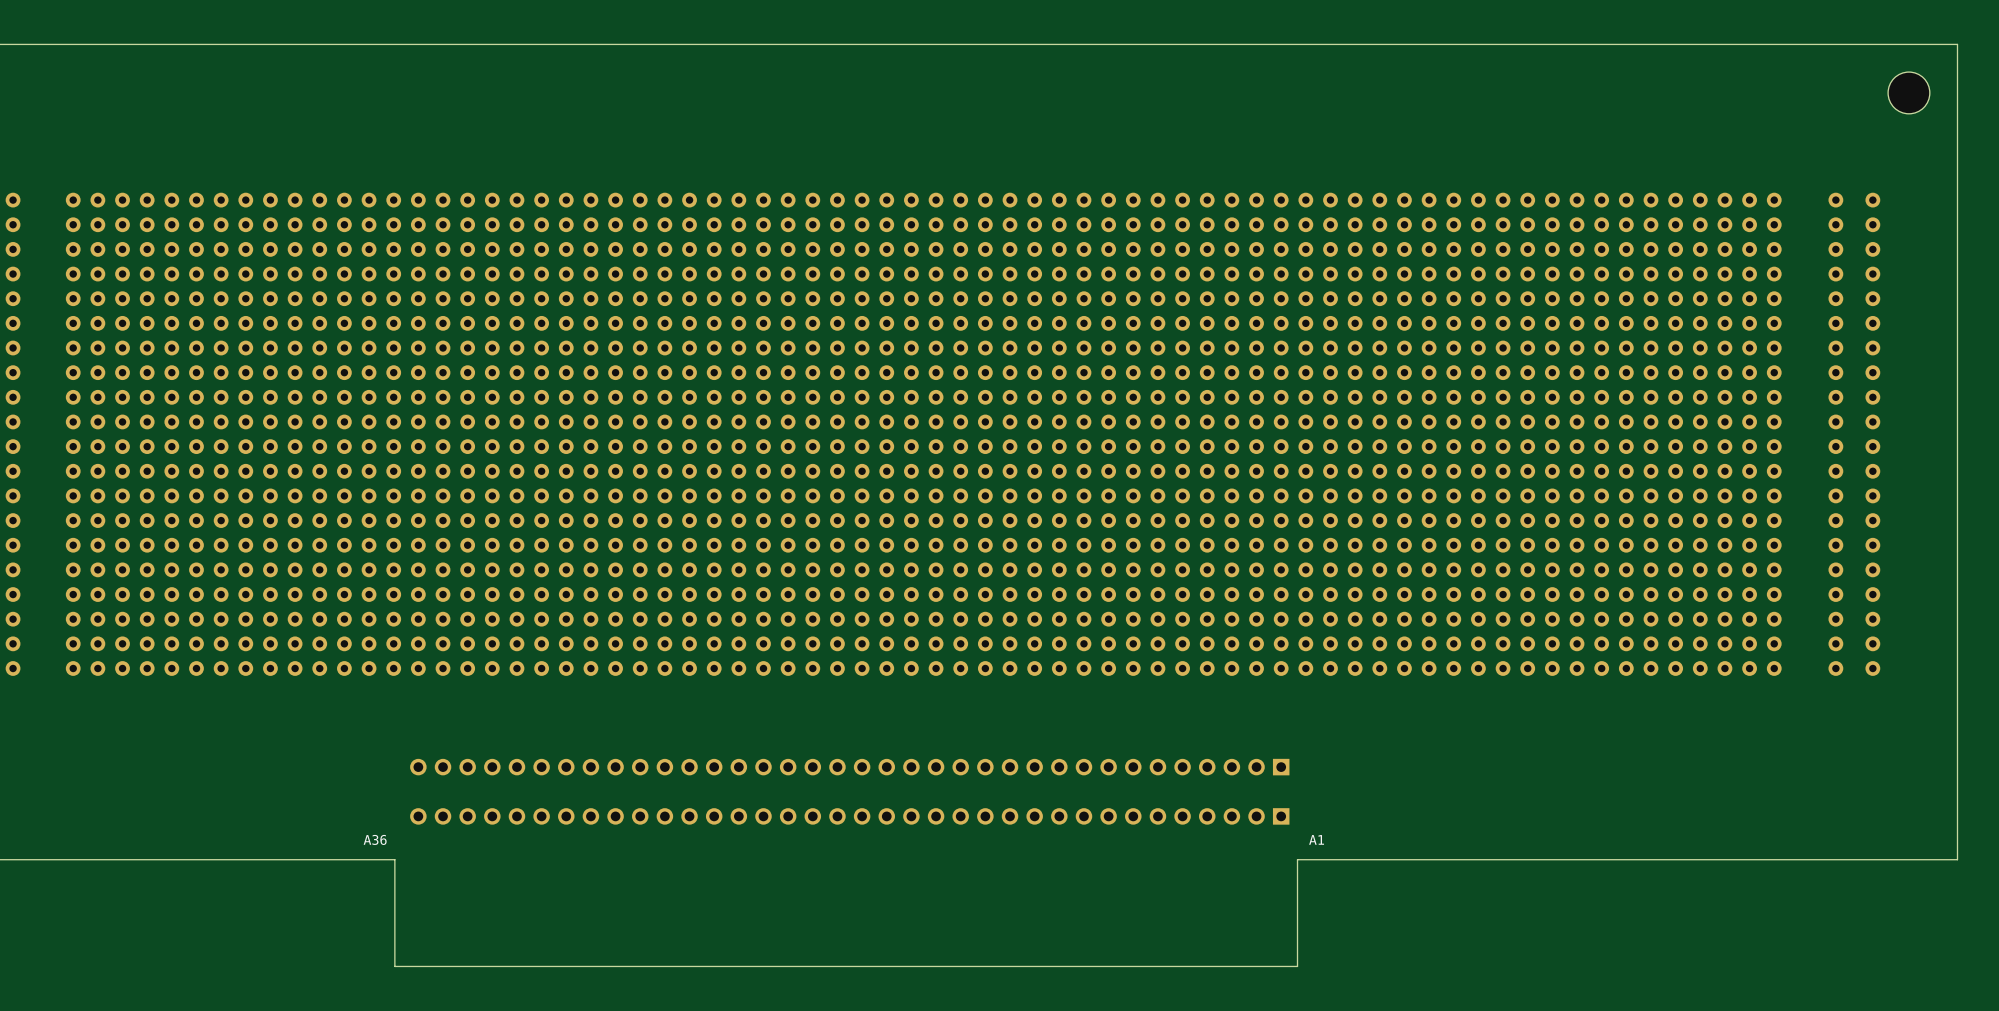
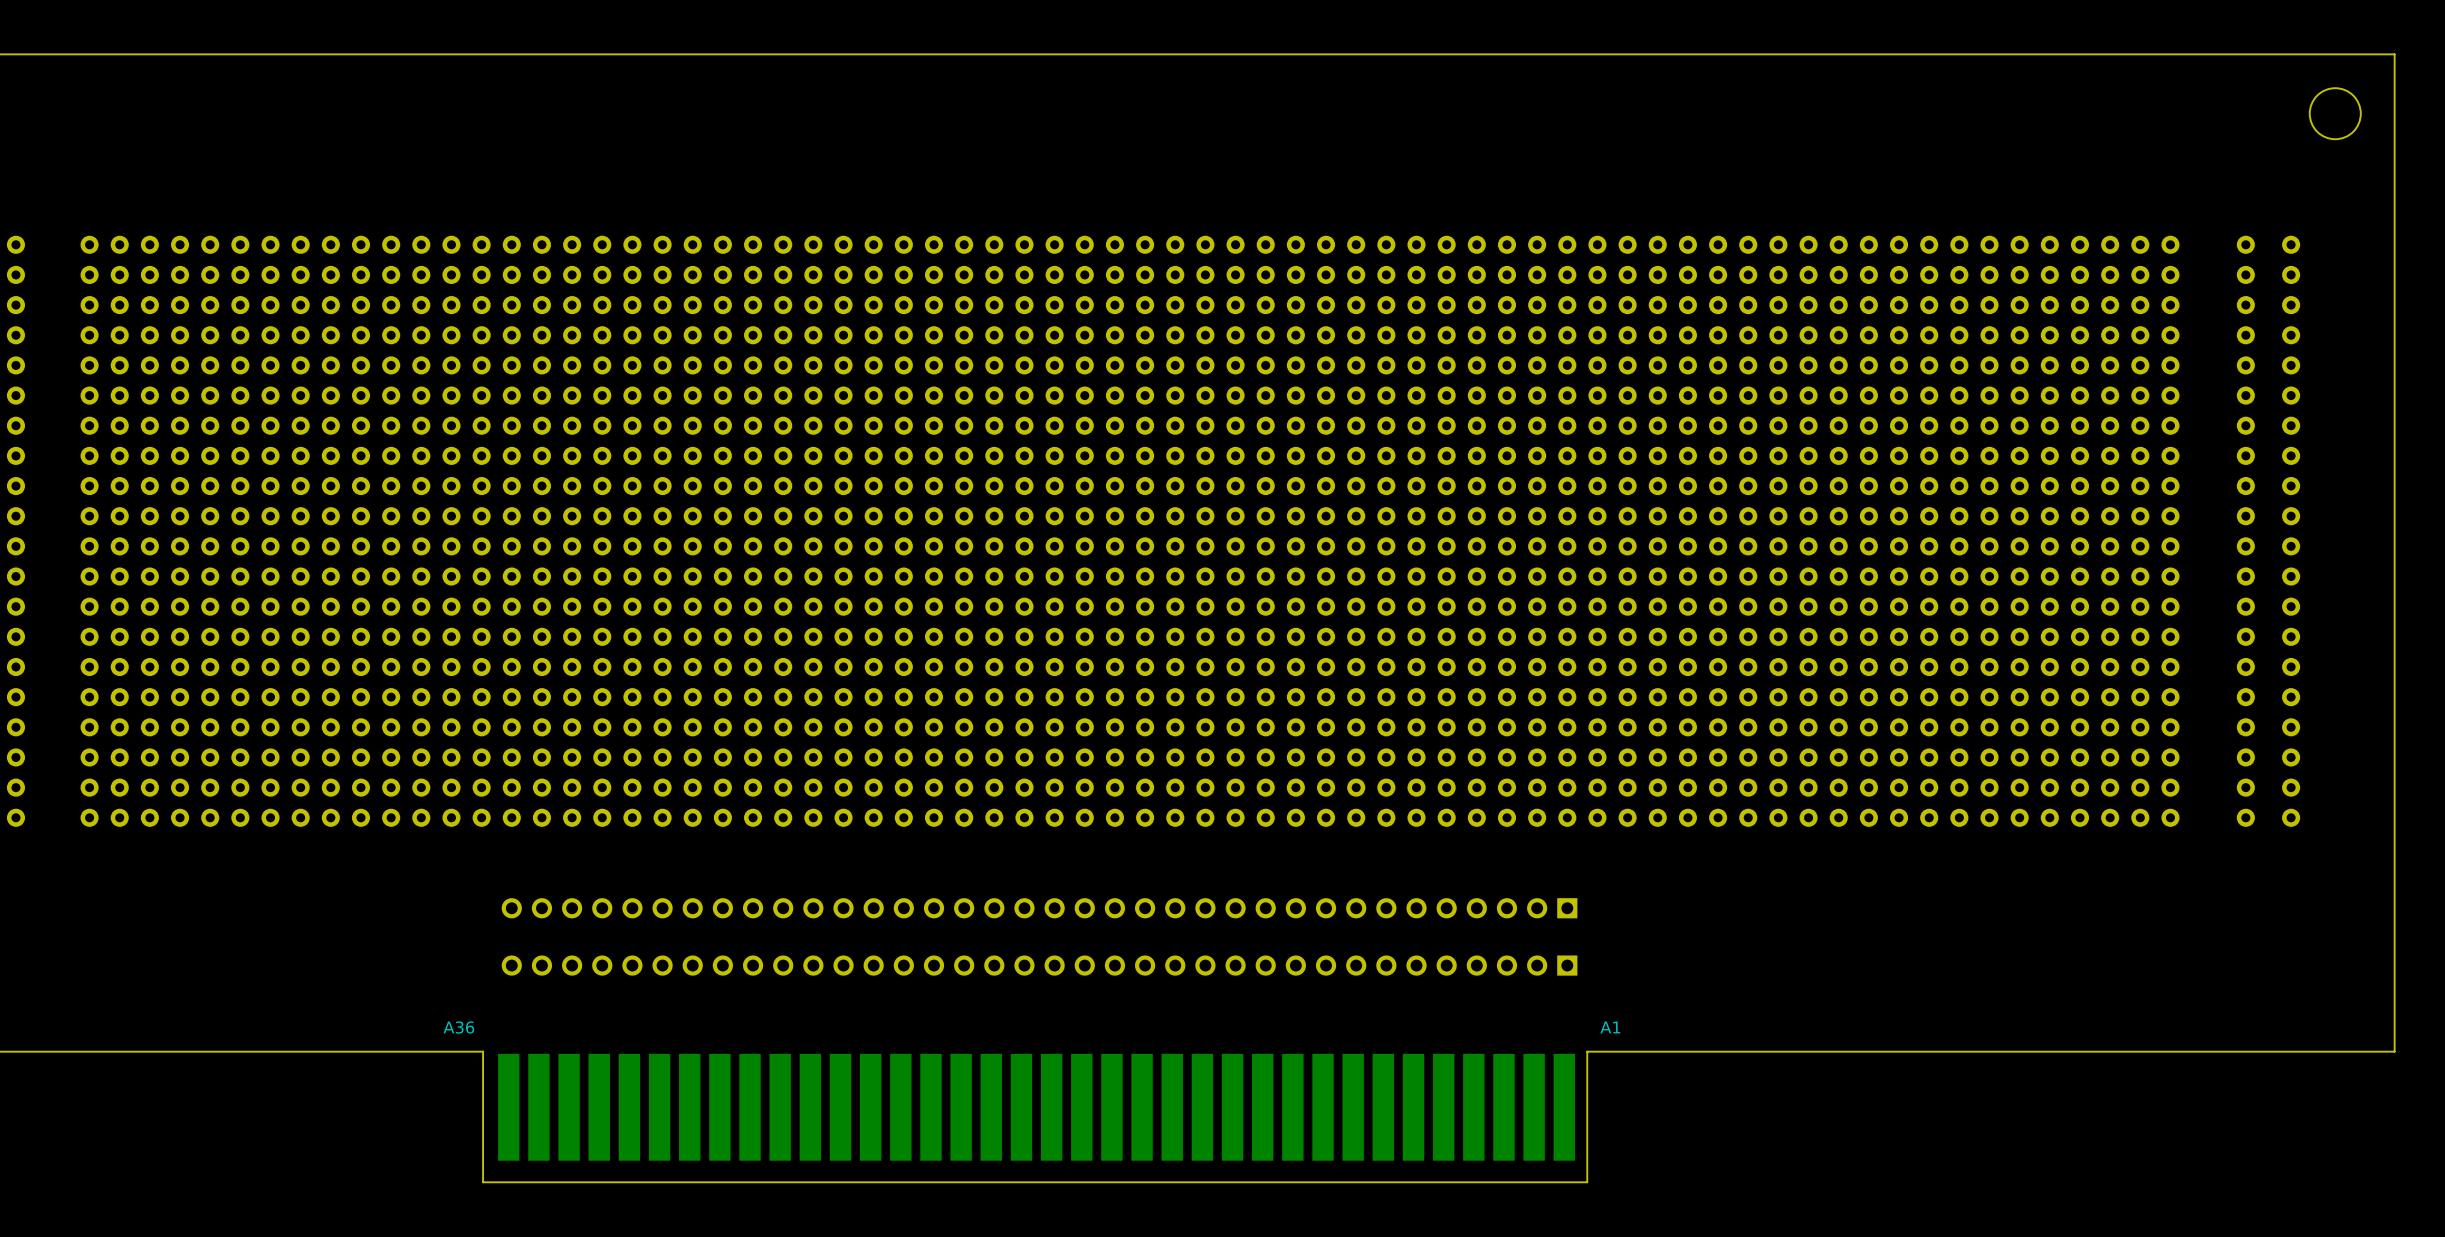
part: none -> (1039, 908)
part: (849, 767) -> none
part: none -> (1039, 965)
part: (849, 816) -> none
part: none -> (1036, 1107)

